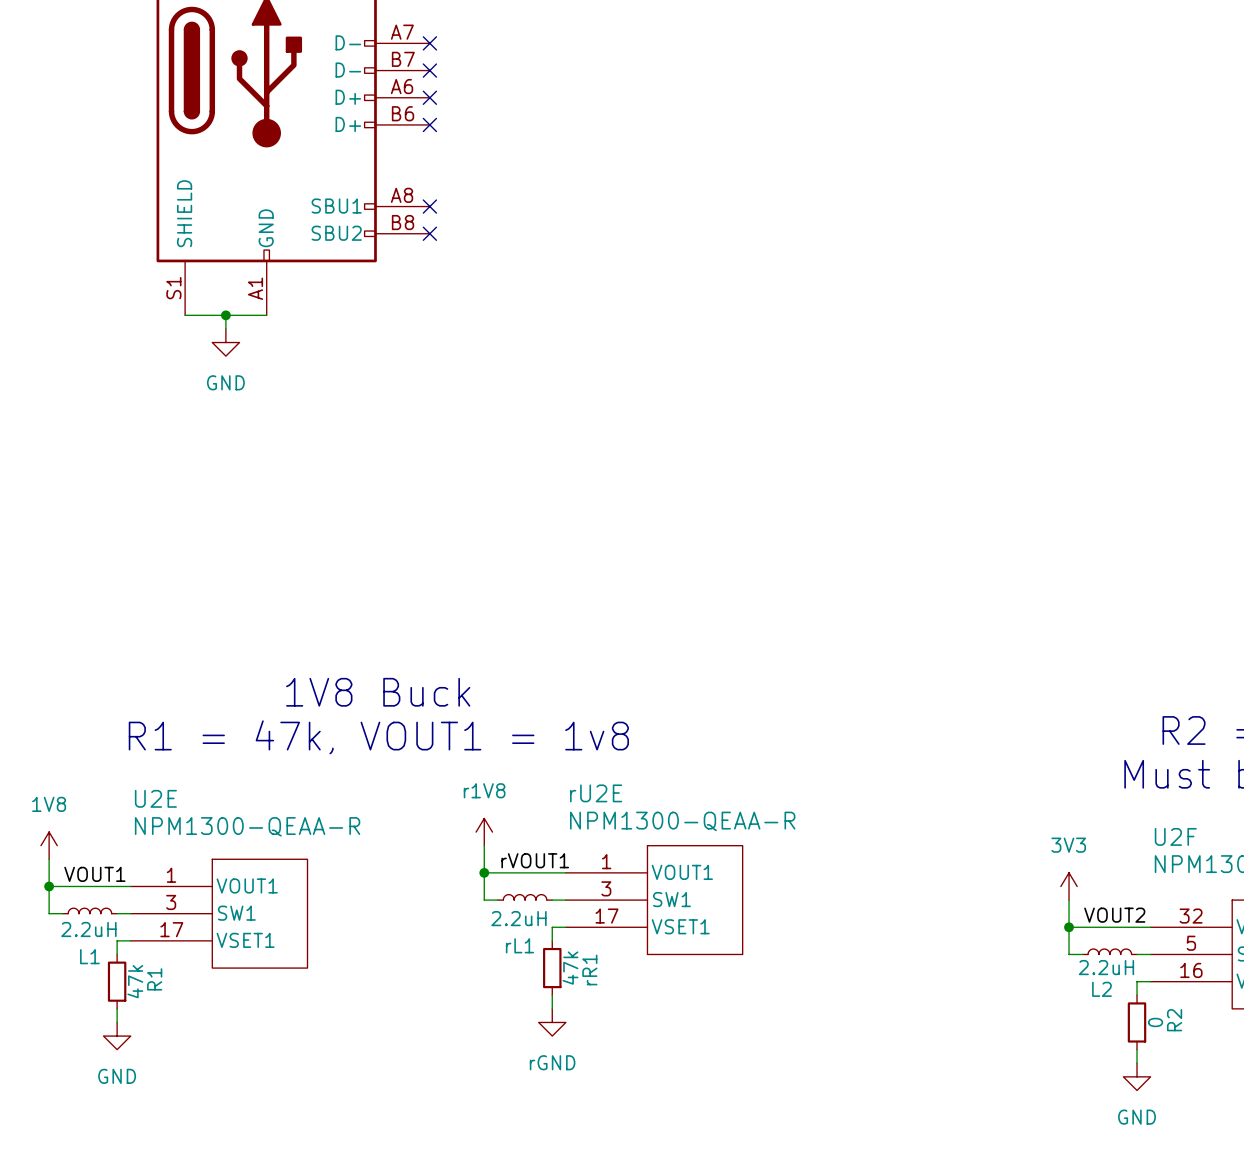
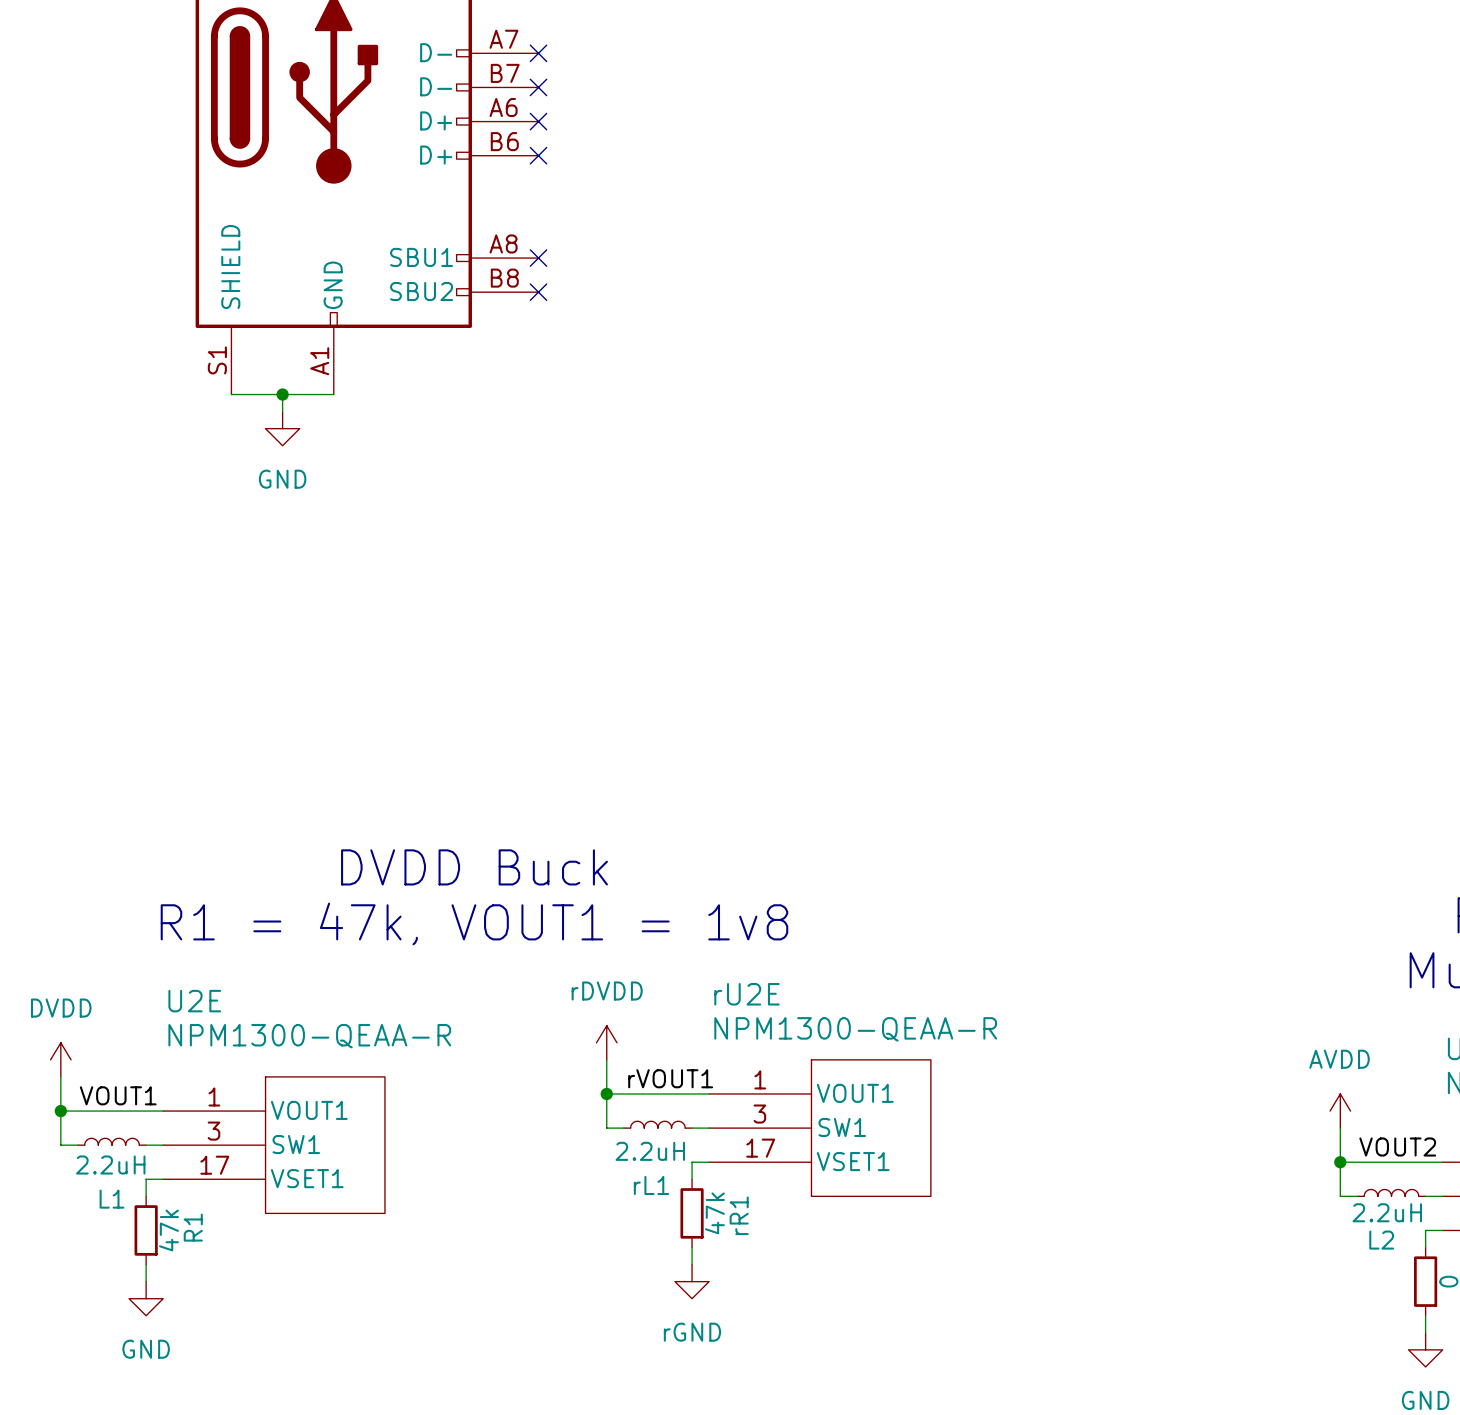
text: 1V8 Buck (378, 692) -> DVDD Buck (474, 867)
power symbol: r1V8 (484, 832) -> rDVDD (606, 1042)
power symbol: 1V8 (49, 845) -> DVDD (60, 1059)
power symbol: 3V3 (1069, 886) -> AVDD (1340, 1111)

